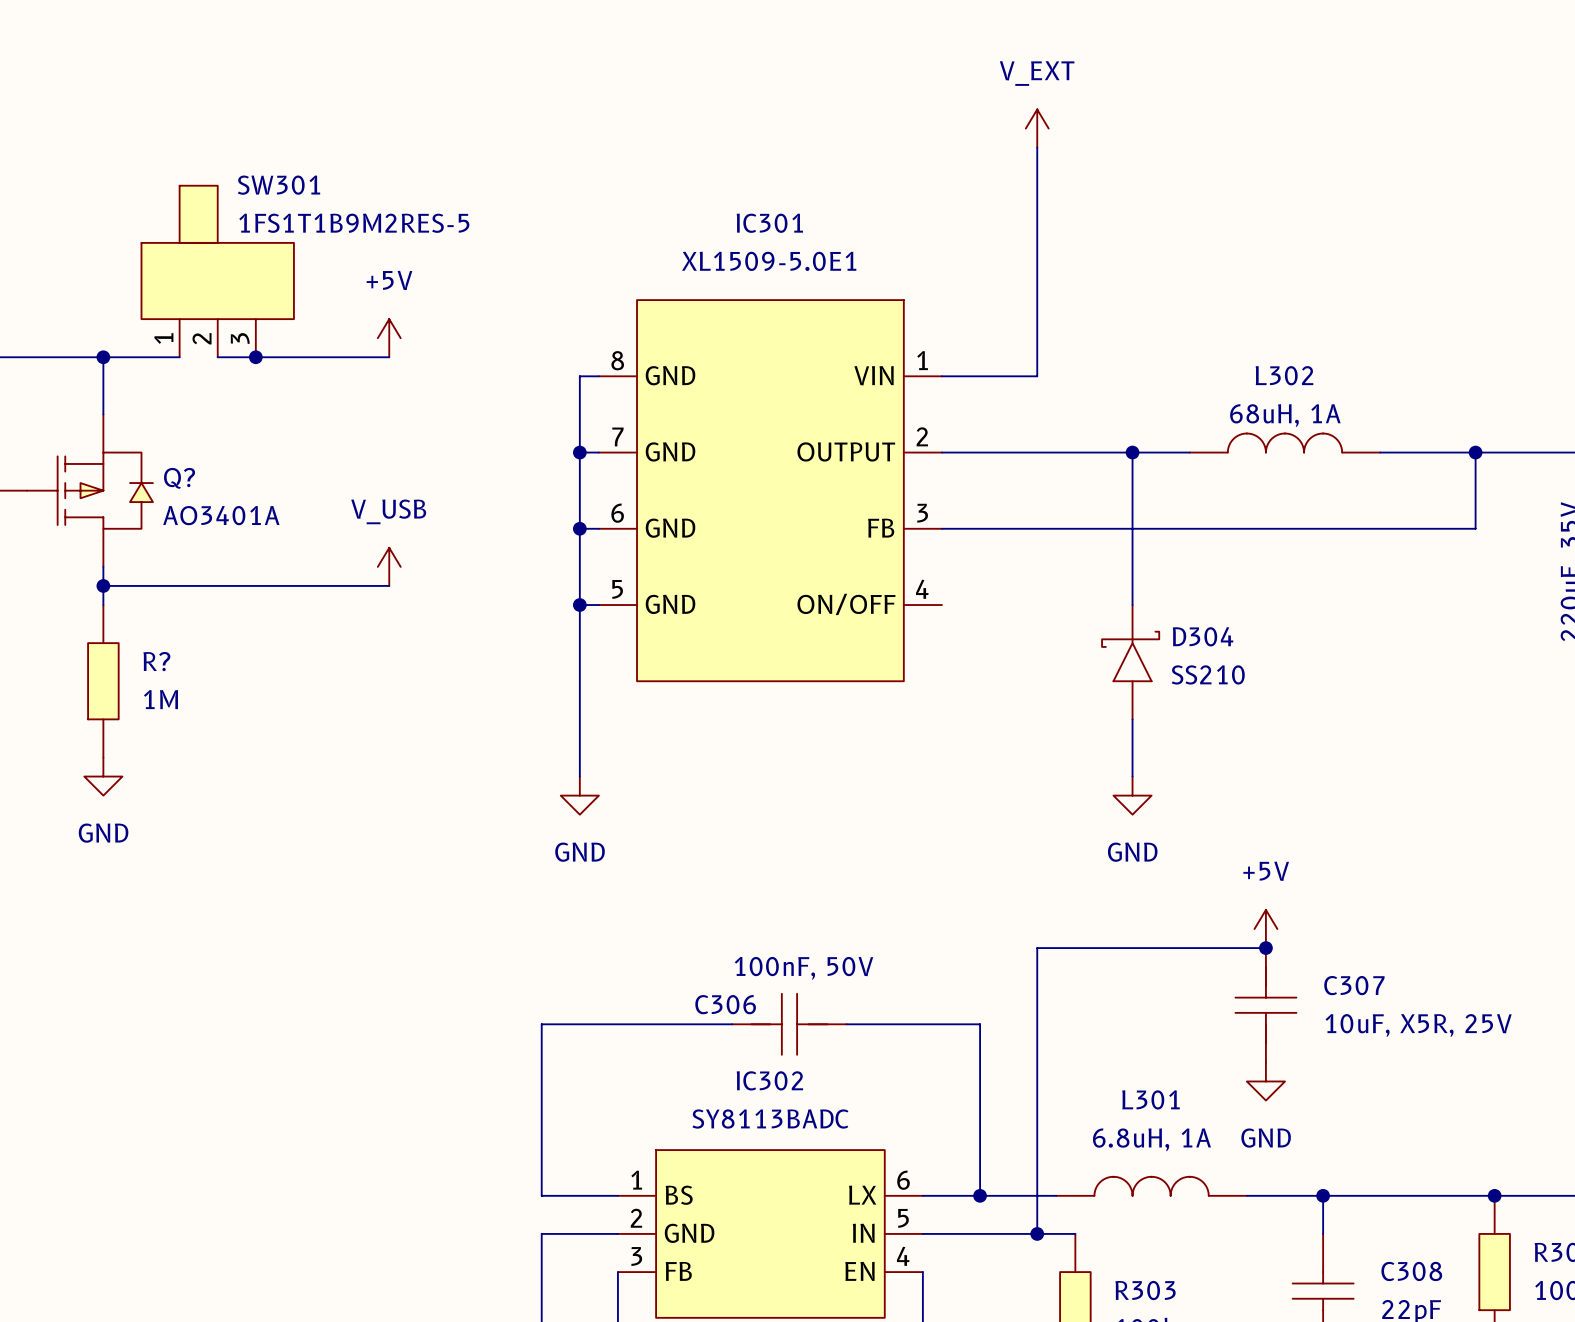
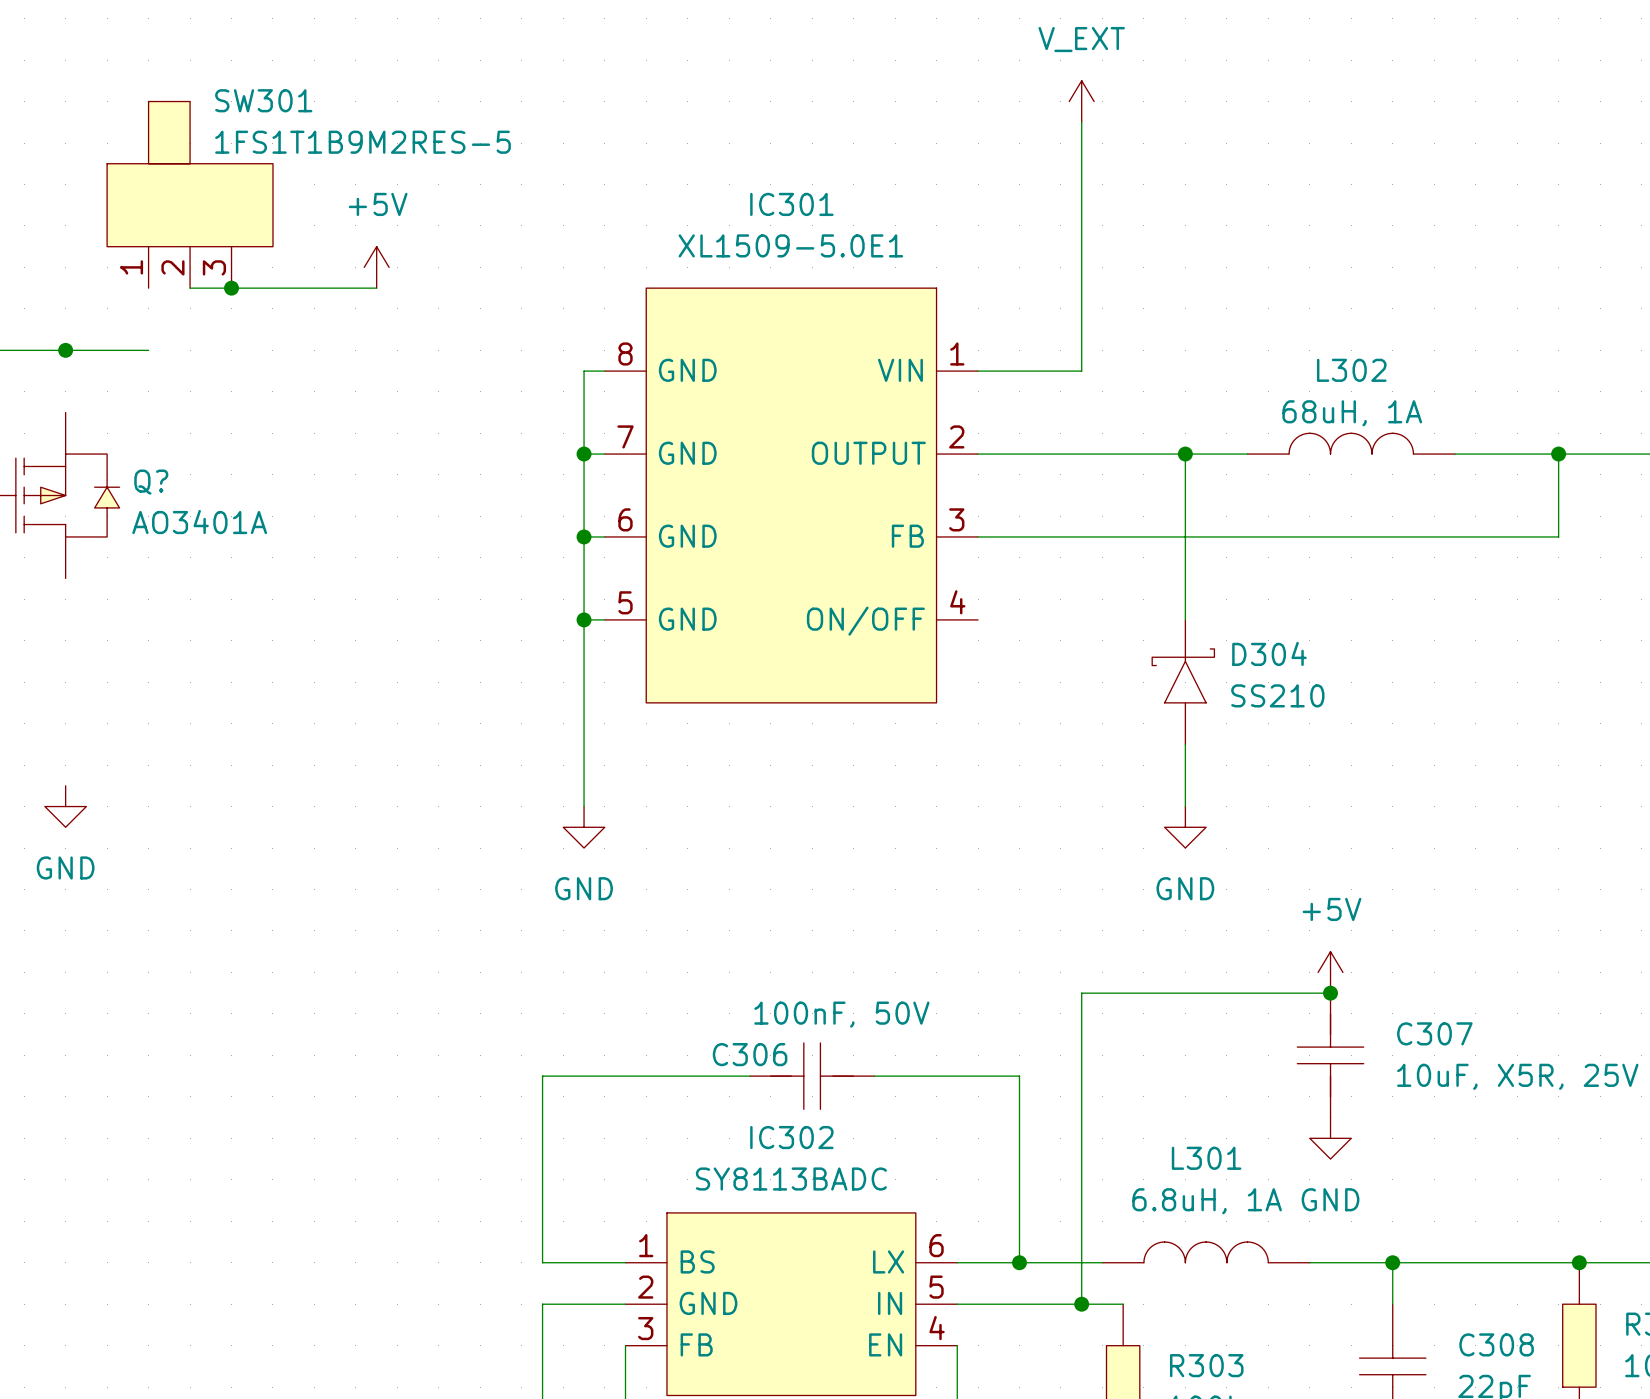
SW301 position: (217, 271) -> (190, 194)
power symbol position: +5V (389, 338) -> +5V (376, 267)
wire: (103, 357) (103, 414) -> none
wire: (217, 357) (389, 357) -> (190, 288) (376, 288)
junction position: (255, 357) -> (231, 288)
wire: (103, 566) (103, 605) -> none
power symbol: V_USB (389, 566) -> none
wire: (103, 585) (389, 585) -> none
junction: (103, 585) -> none
R?: 1M (103, 681) -> none

